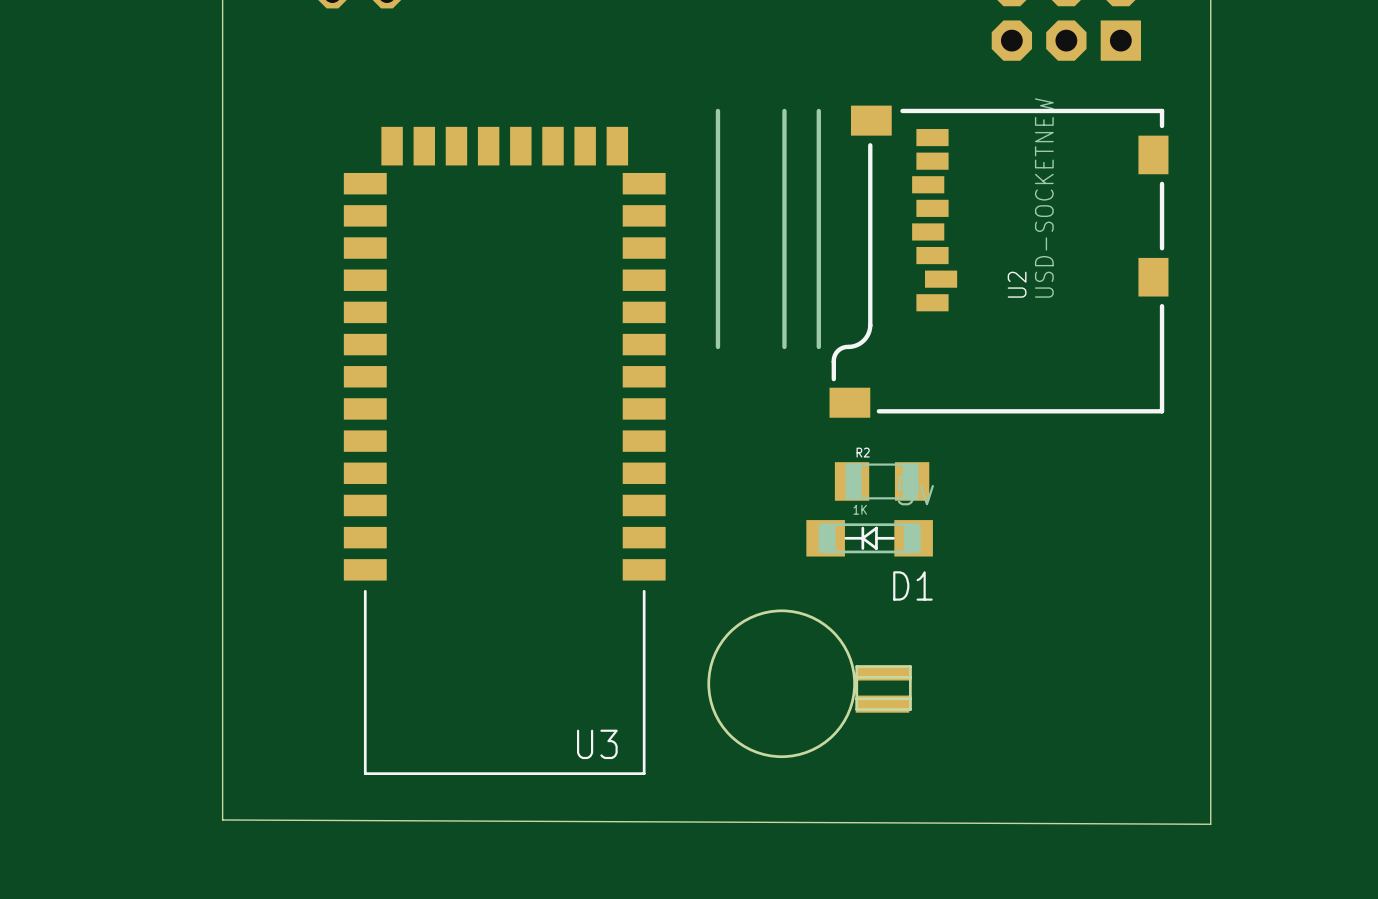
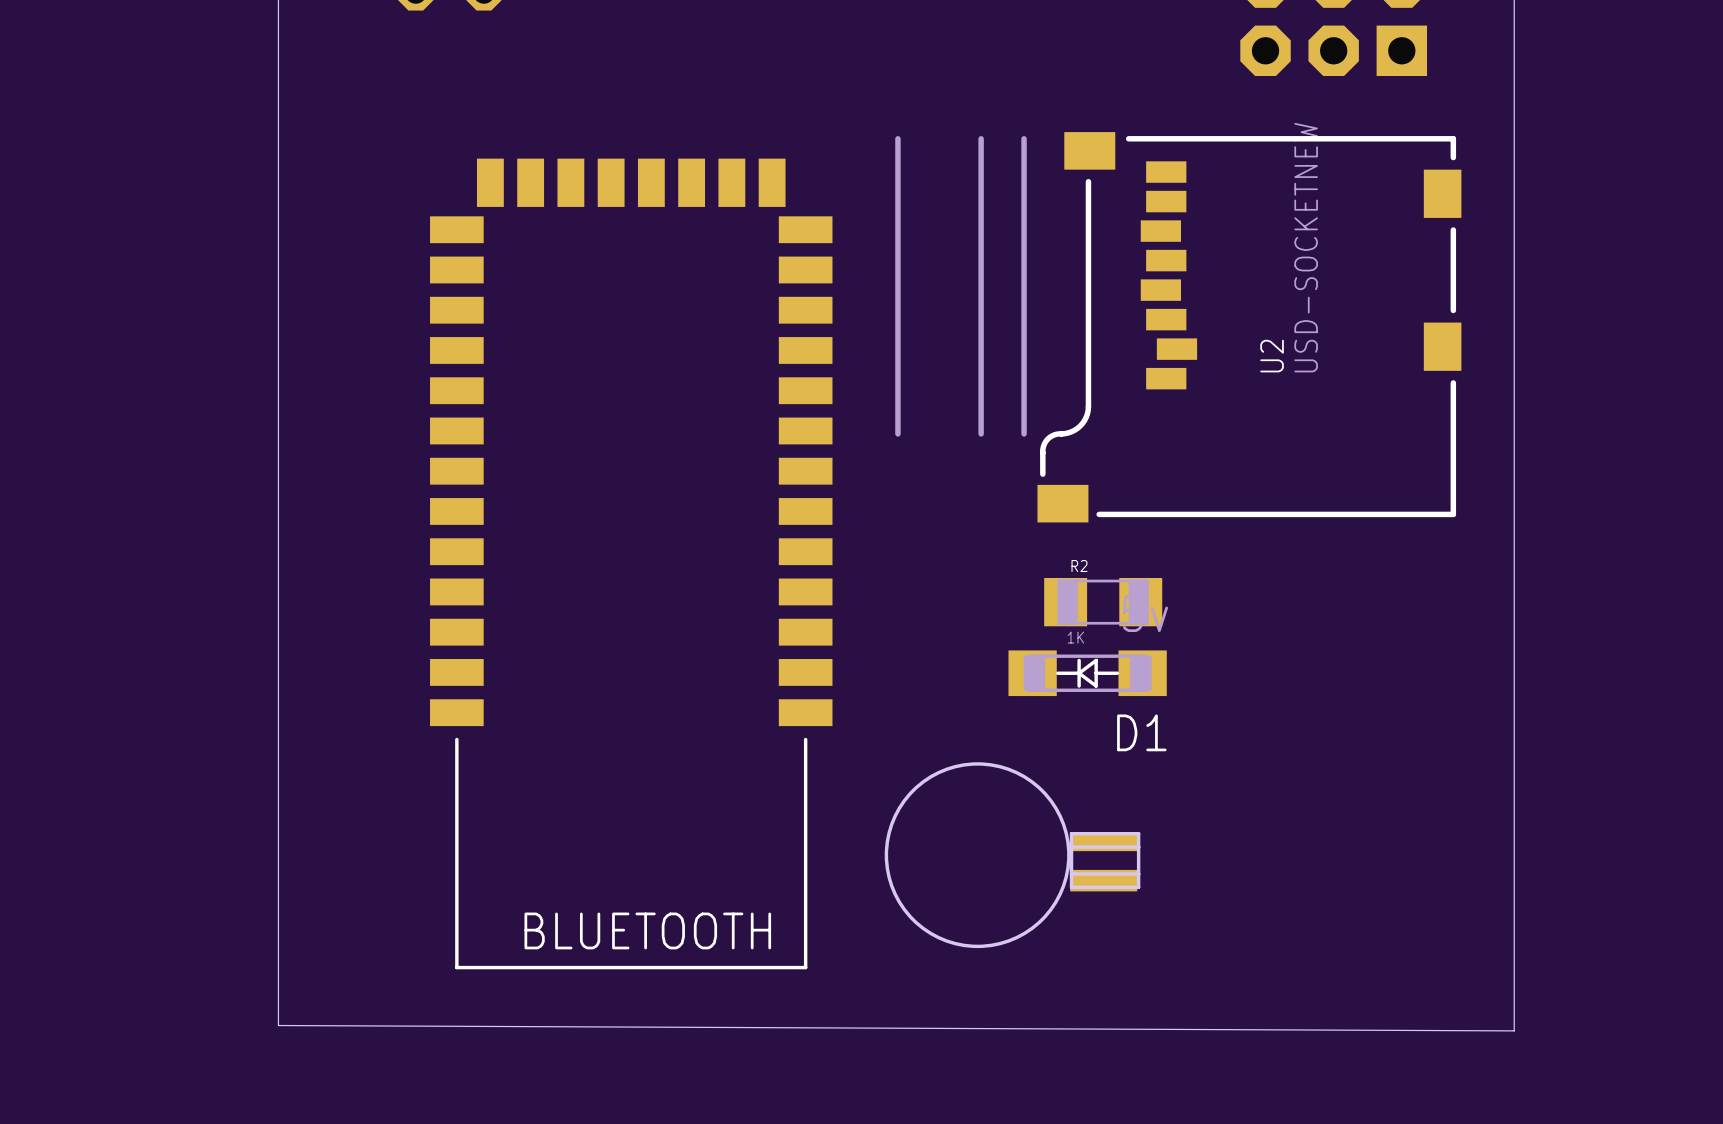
U3 name: U3 (597, 744) -> BLUETOOTH (647, 930)

